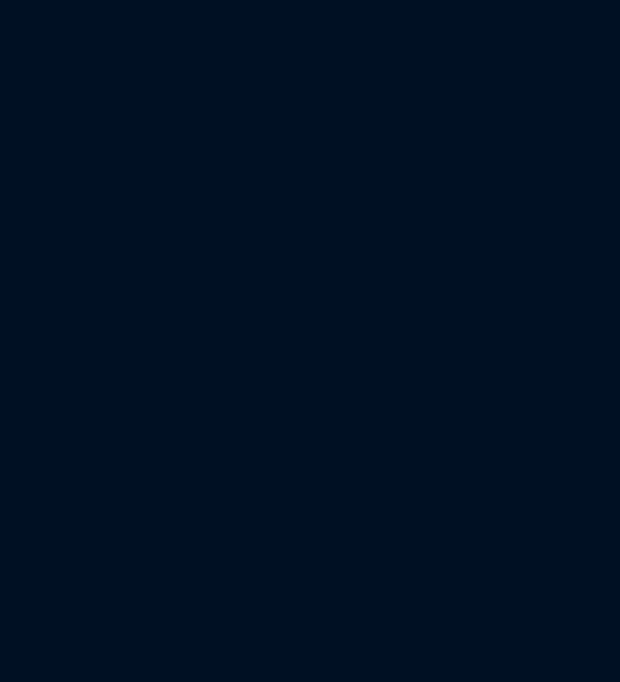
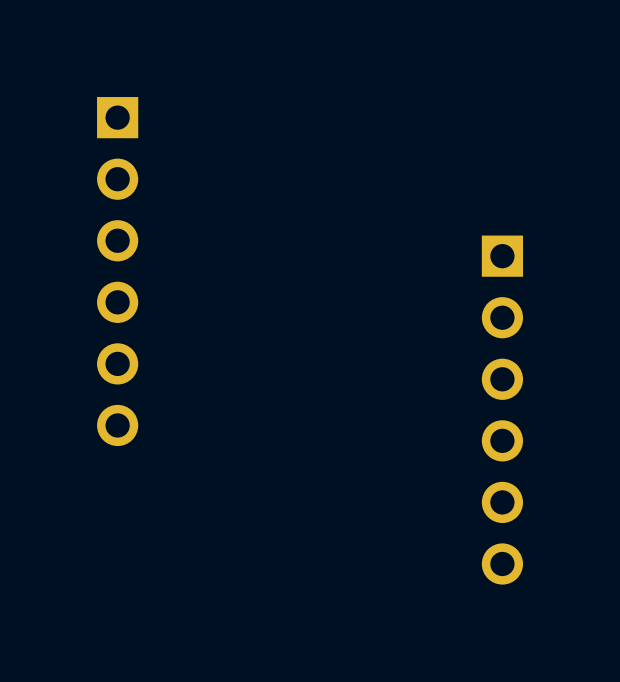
part: none -> (117, 271)
part: none -> (502, 410)

